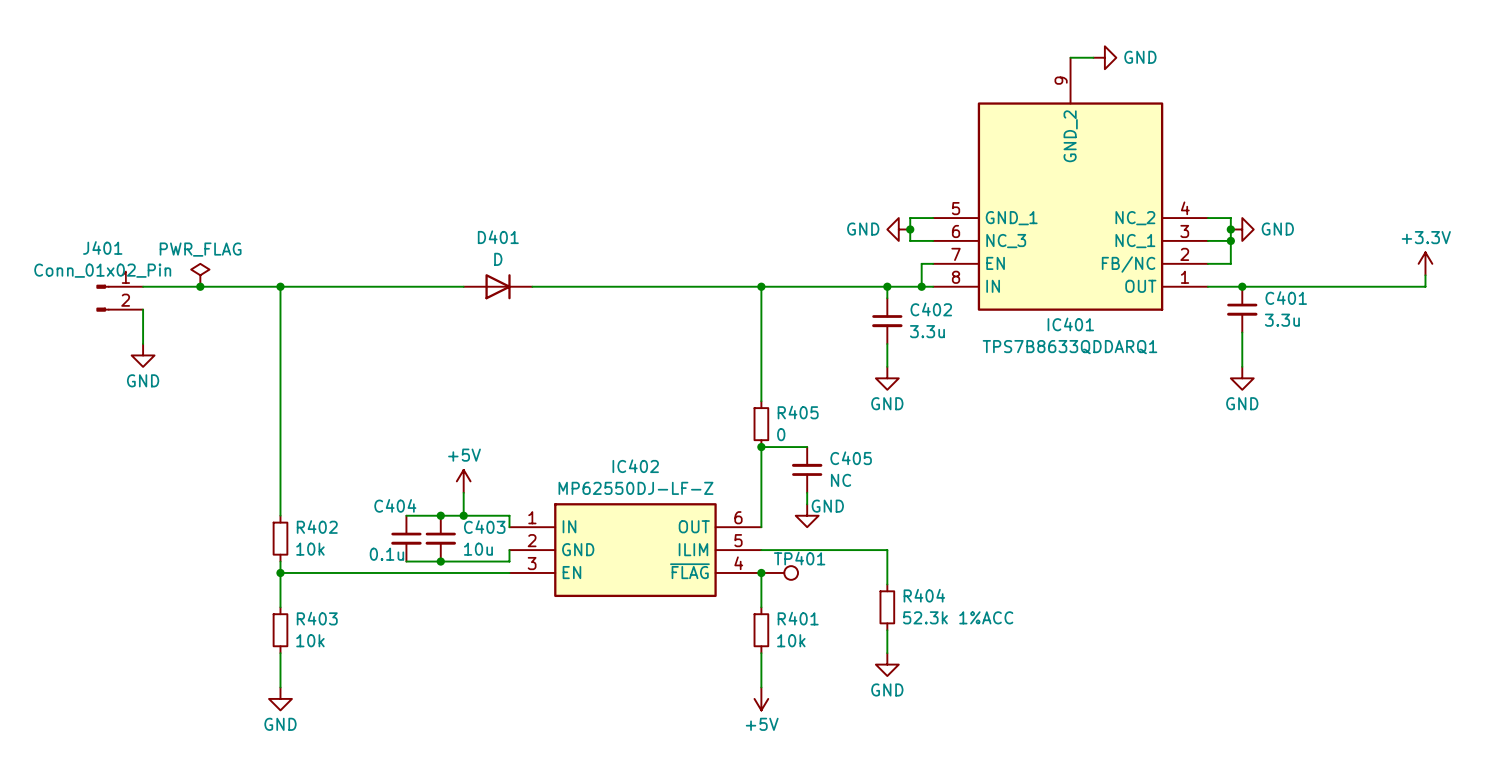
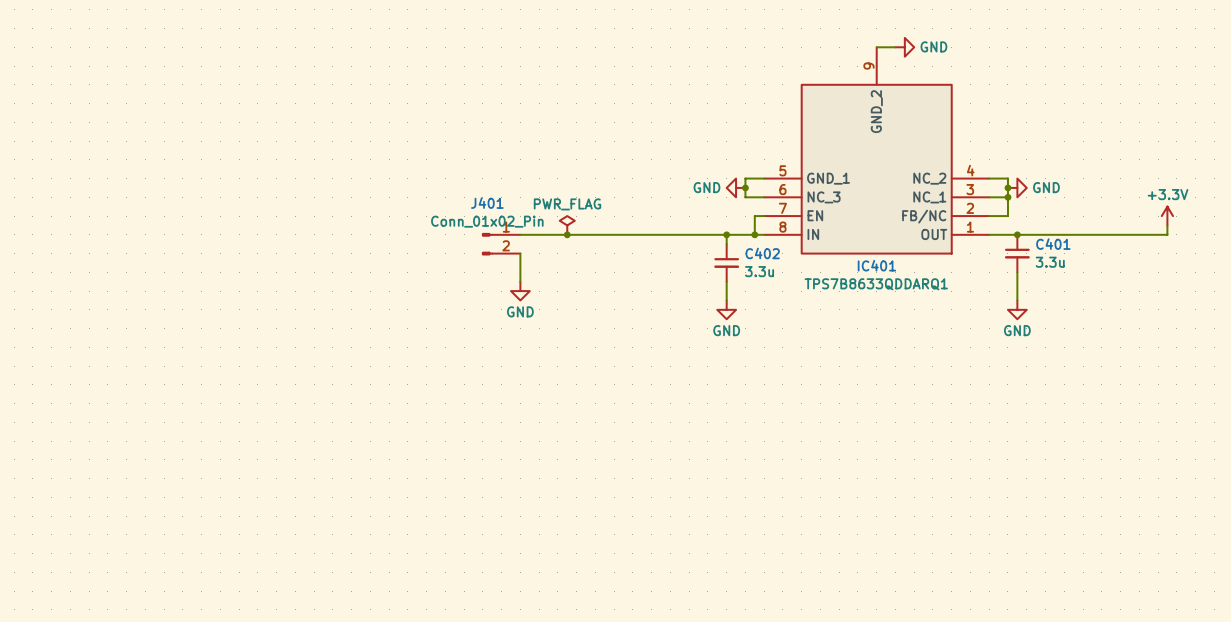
power symbol: PWR_FLAG (200, 275) -> none
power symbol: none -> PWR_FLAG (567, 225)
wire: (143, 286) (463, 286) -> none
junction: (200, 286) -> none
wire: (280, 286) (280, 515) -> none
junction: (280, 286) -> none
D401: D (498, 286) -> none
wire: (532, 286) (635, 286) -> none
junction: none -> (567, 234)
wire: (761, 286) (761, 401) -> none
junction: (761, 286) -> none
J401 position: (119, 298) -> (501, 244)
wire: (143, 309) (143, 343) -> none
wire: none -> (520, 253) (520, 281)
power symbol: GND (143, 355) -> none
power symbol: none -> GND (520, 291)
R405: 0 (761, 424) -> none
junction: (761, 447) -> none
wire: (807, 447) (761, 447) (761, 527) -> none
C405: NC (807, 469) -> none
power symbol: +5V (463, 481) -> none
wire: (463, 492) (463, 515) -> none
wire: (807, 492) (807, 504) -> none
wire: (406, 515) (509, 515) (509, 527) -> none
junction: (440, 515) -> none
junction: (463, 515) -> none
power symbol: GND (807, 515) -> none
R402: 10k (280, 538) -> none
C404: 0.1u (406, 538) -> none
C403: 10u (440, 538) -> none
wire: (509, 550) (509, 561) (406, 561) -> none
IC402: MP62550DJ-LF-Z (635, 550) -> none
wire: (761, 550) (887, 550) (887, 584) -> none
wire: (280, 561) (280, 607) -> none
junction: (440, 561) -> none
wire: (280, 572) (509, 572) -> none
junction: (280, 572) -> none
wire: (761, 572) (761, 607) -> none
junction: (761, 572) -> none
TP401: (779, 572) -> none
R404: 52.3k 1%ACC (887, 607) -> none
R403: 10k (280, 630) -> none
R401: 10k (761, 630) -> none
wire: (887, 630) (887, 653) -> none
wire: (280, 653) (280, 687) -> none
wire: (761, 653) (761, 687) -> none
power symbol: GND (887, 664) -> none
power symbol: GND (280, 698) -> none
power symbol: +5V (761, 698) -> none

